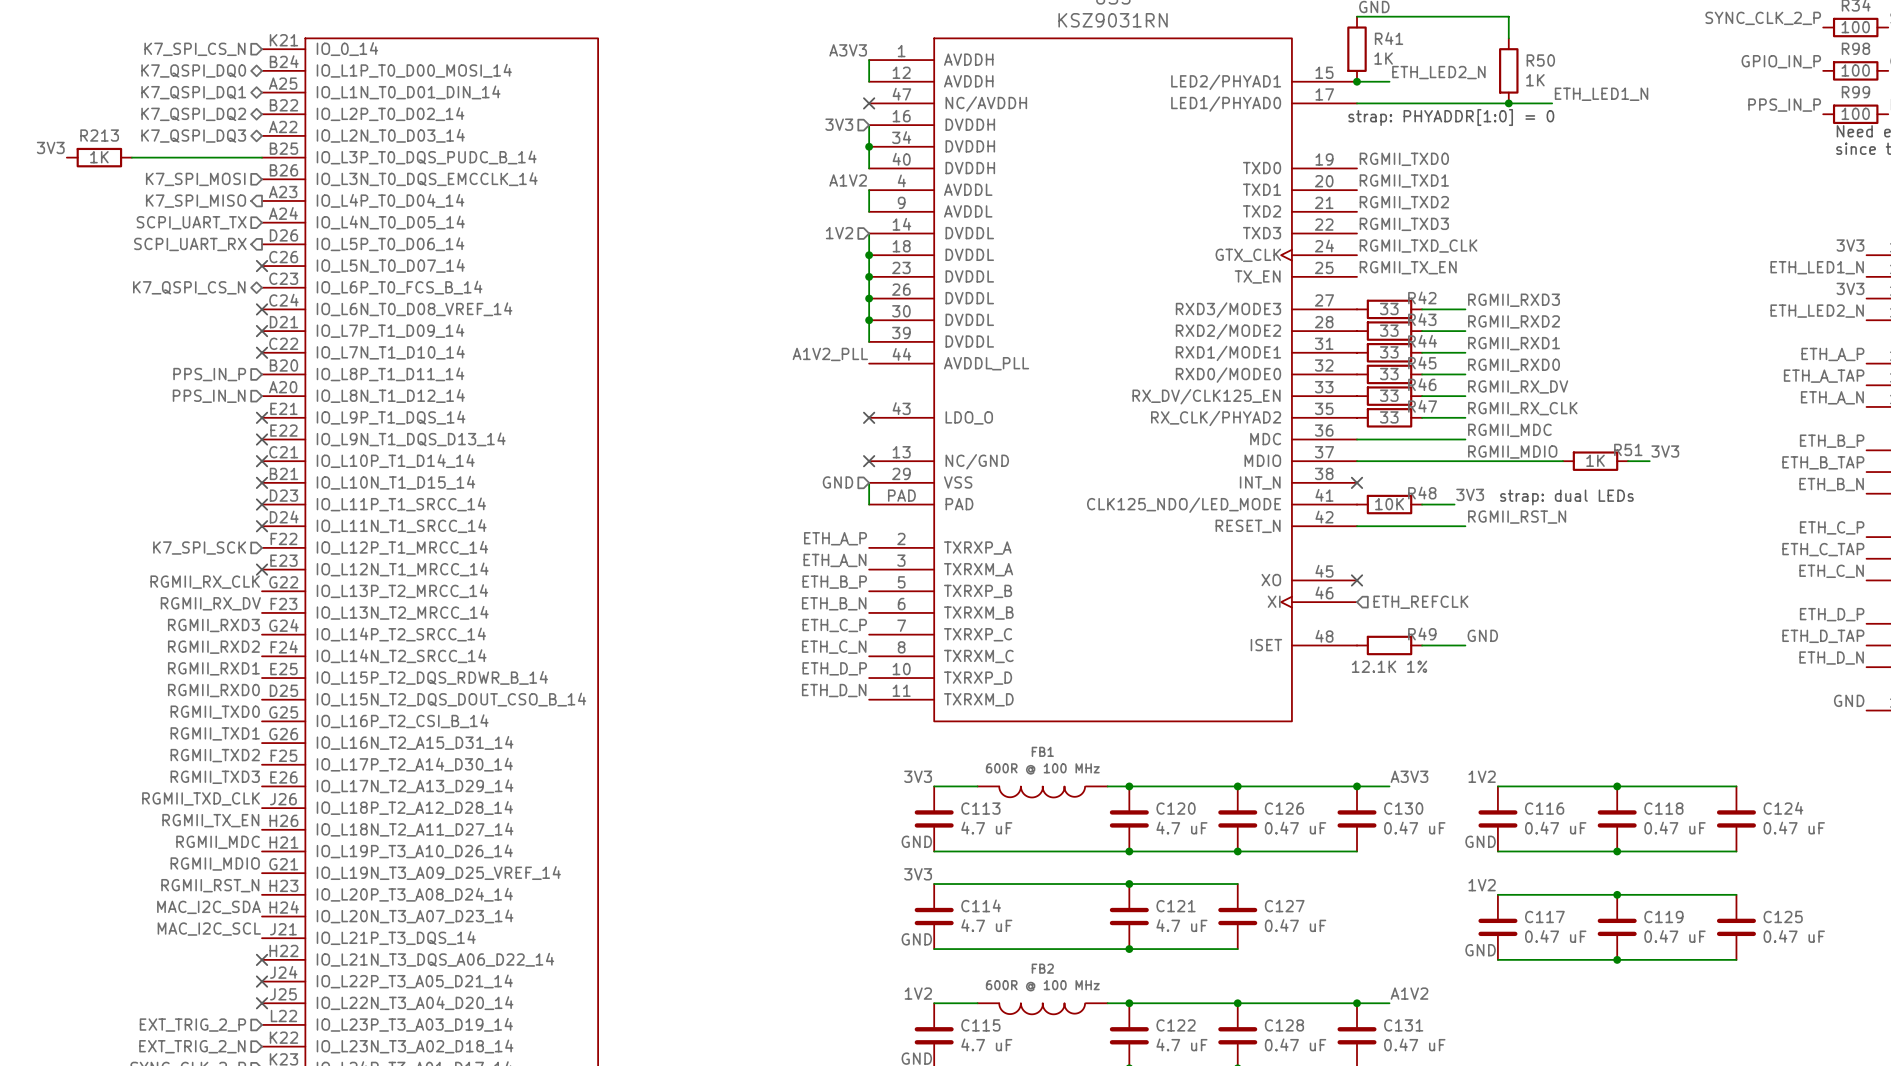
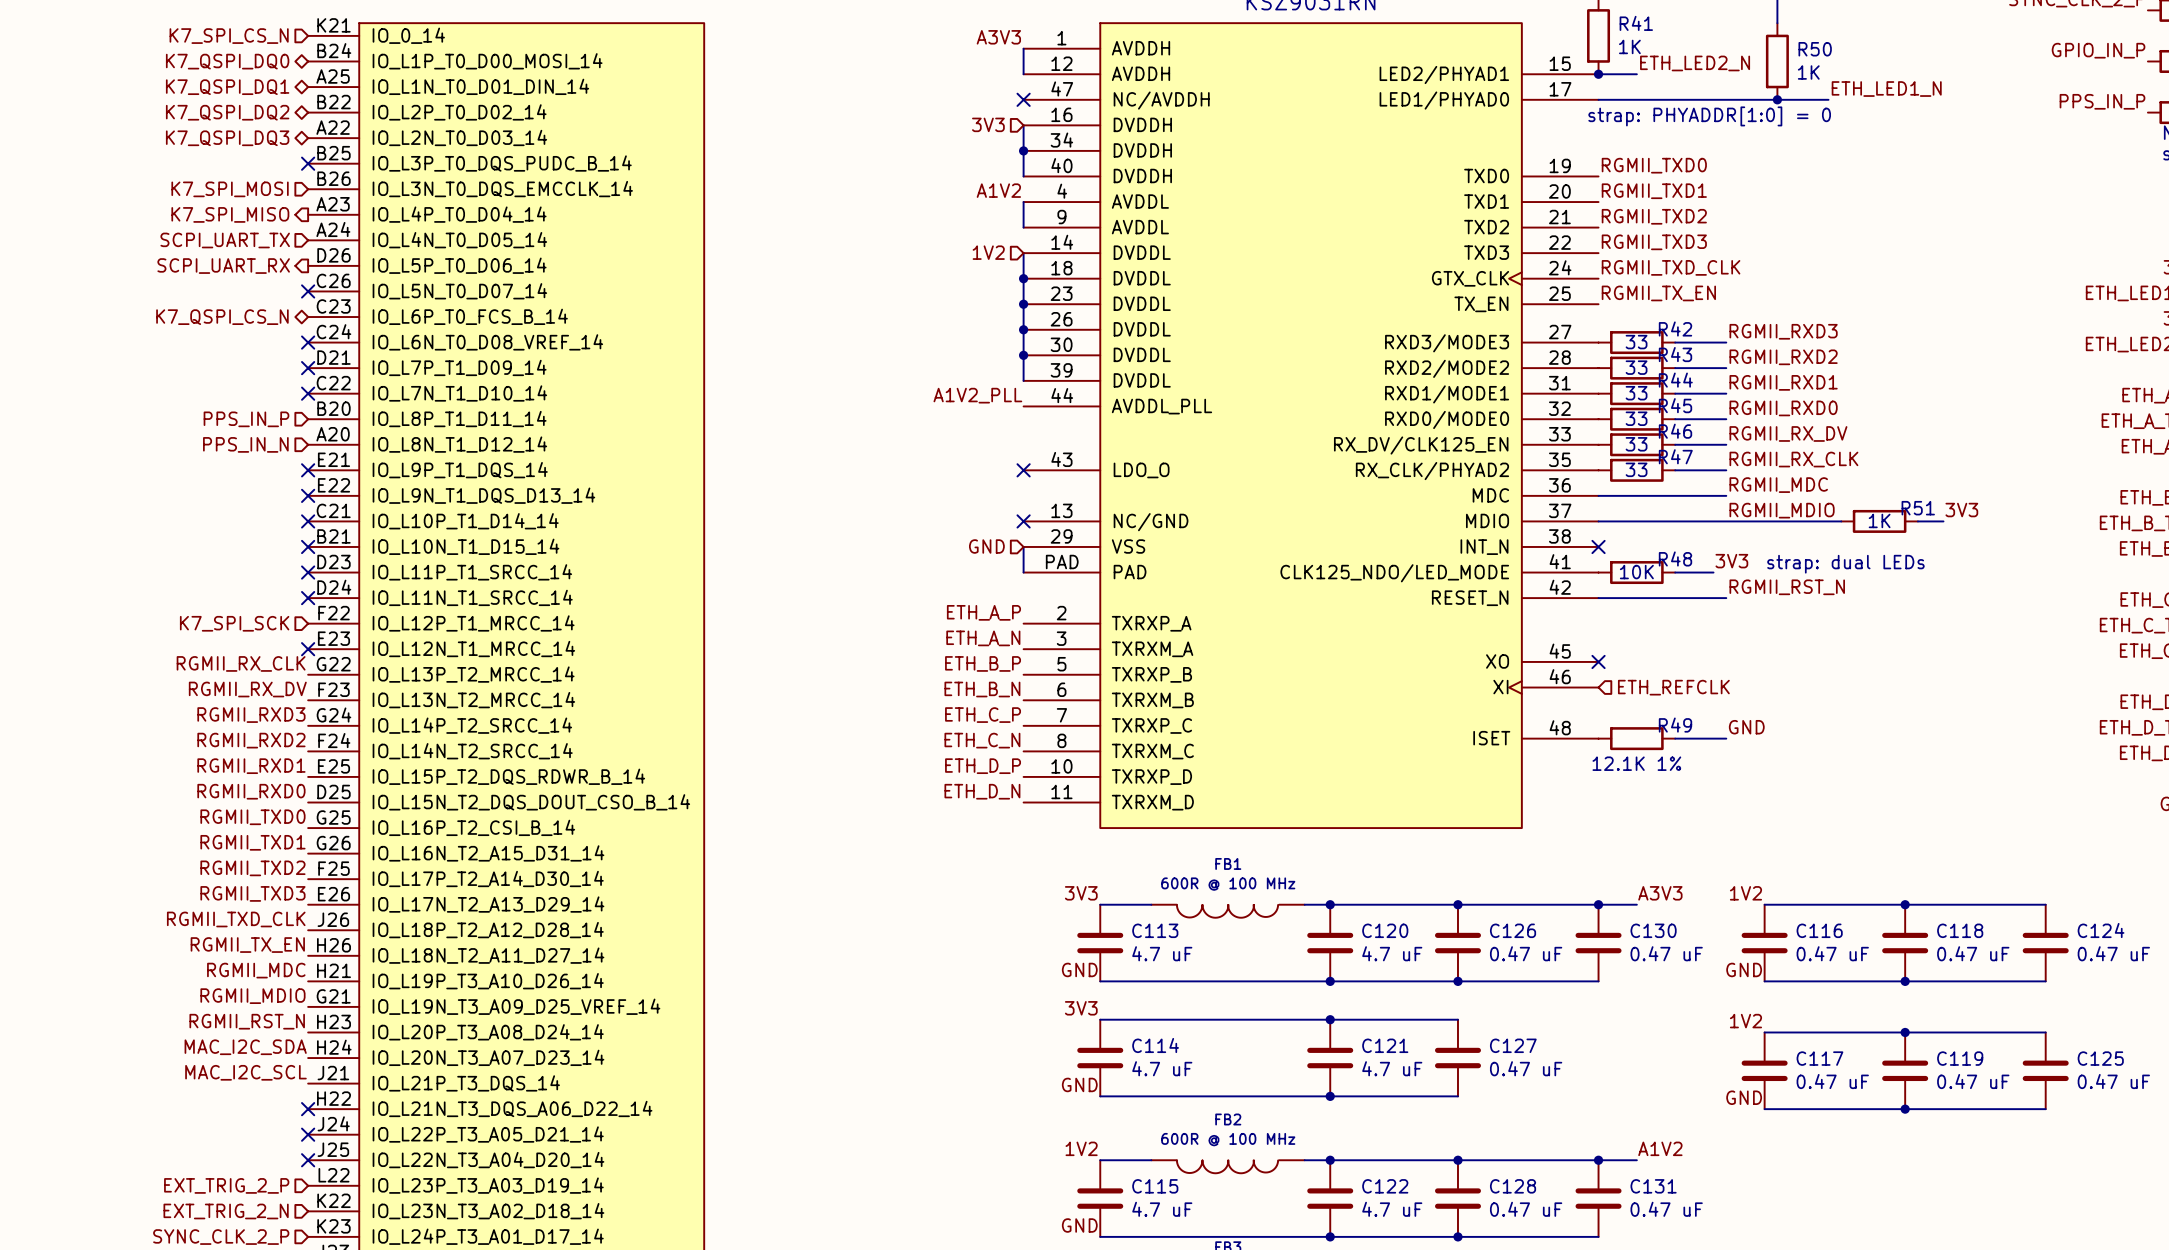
label: 3V3 (50, 147) -> none
R213: 1K (99, 157) -> none
wire: (131, 157) (262, 157) -> none
no-connect mark: none -> (308, 163)

